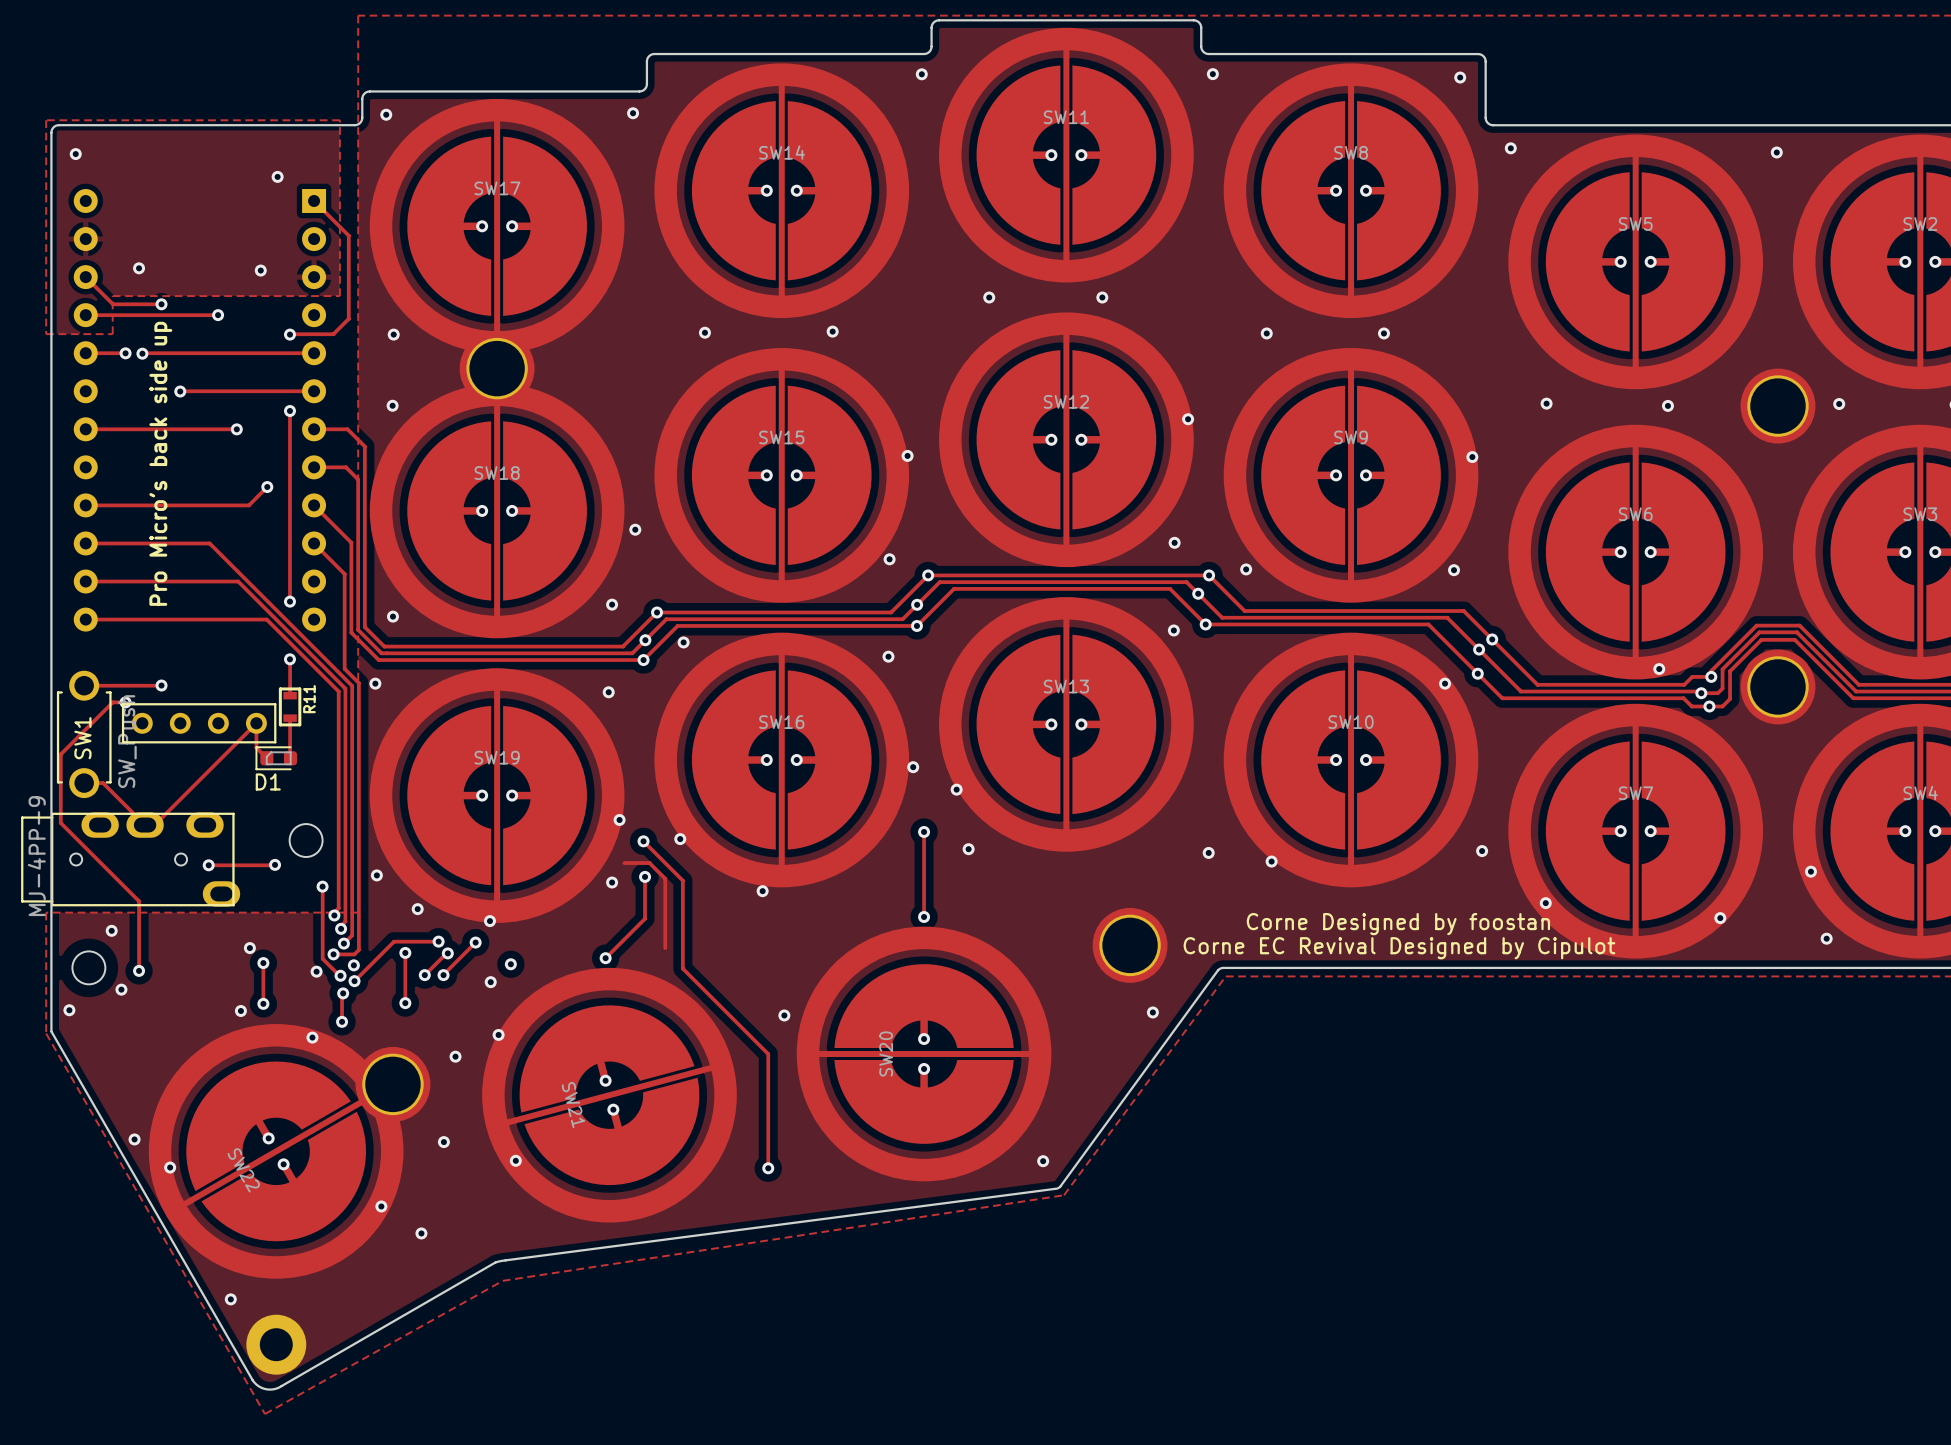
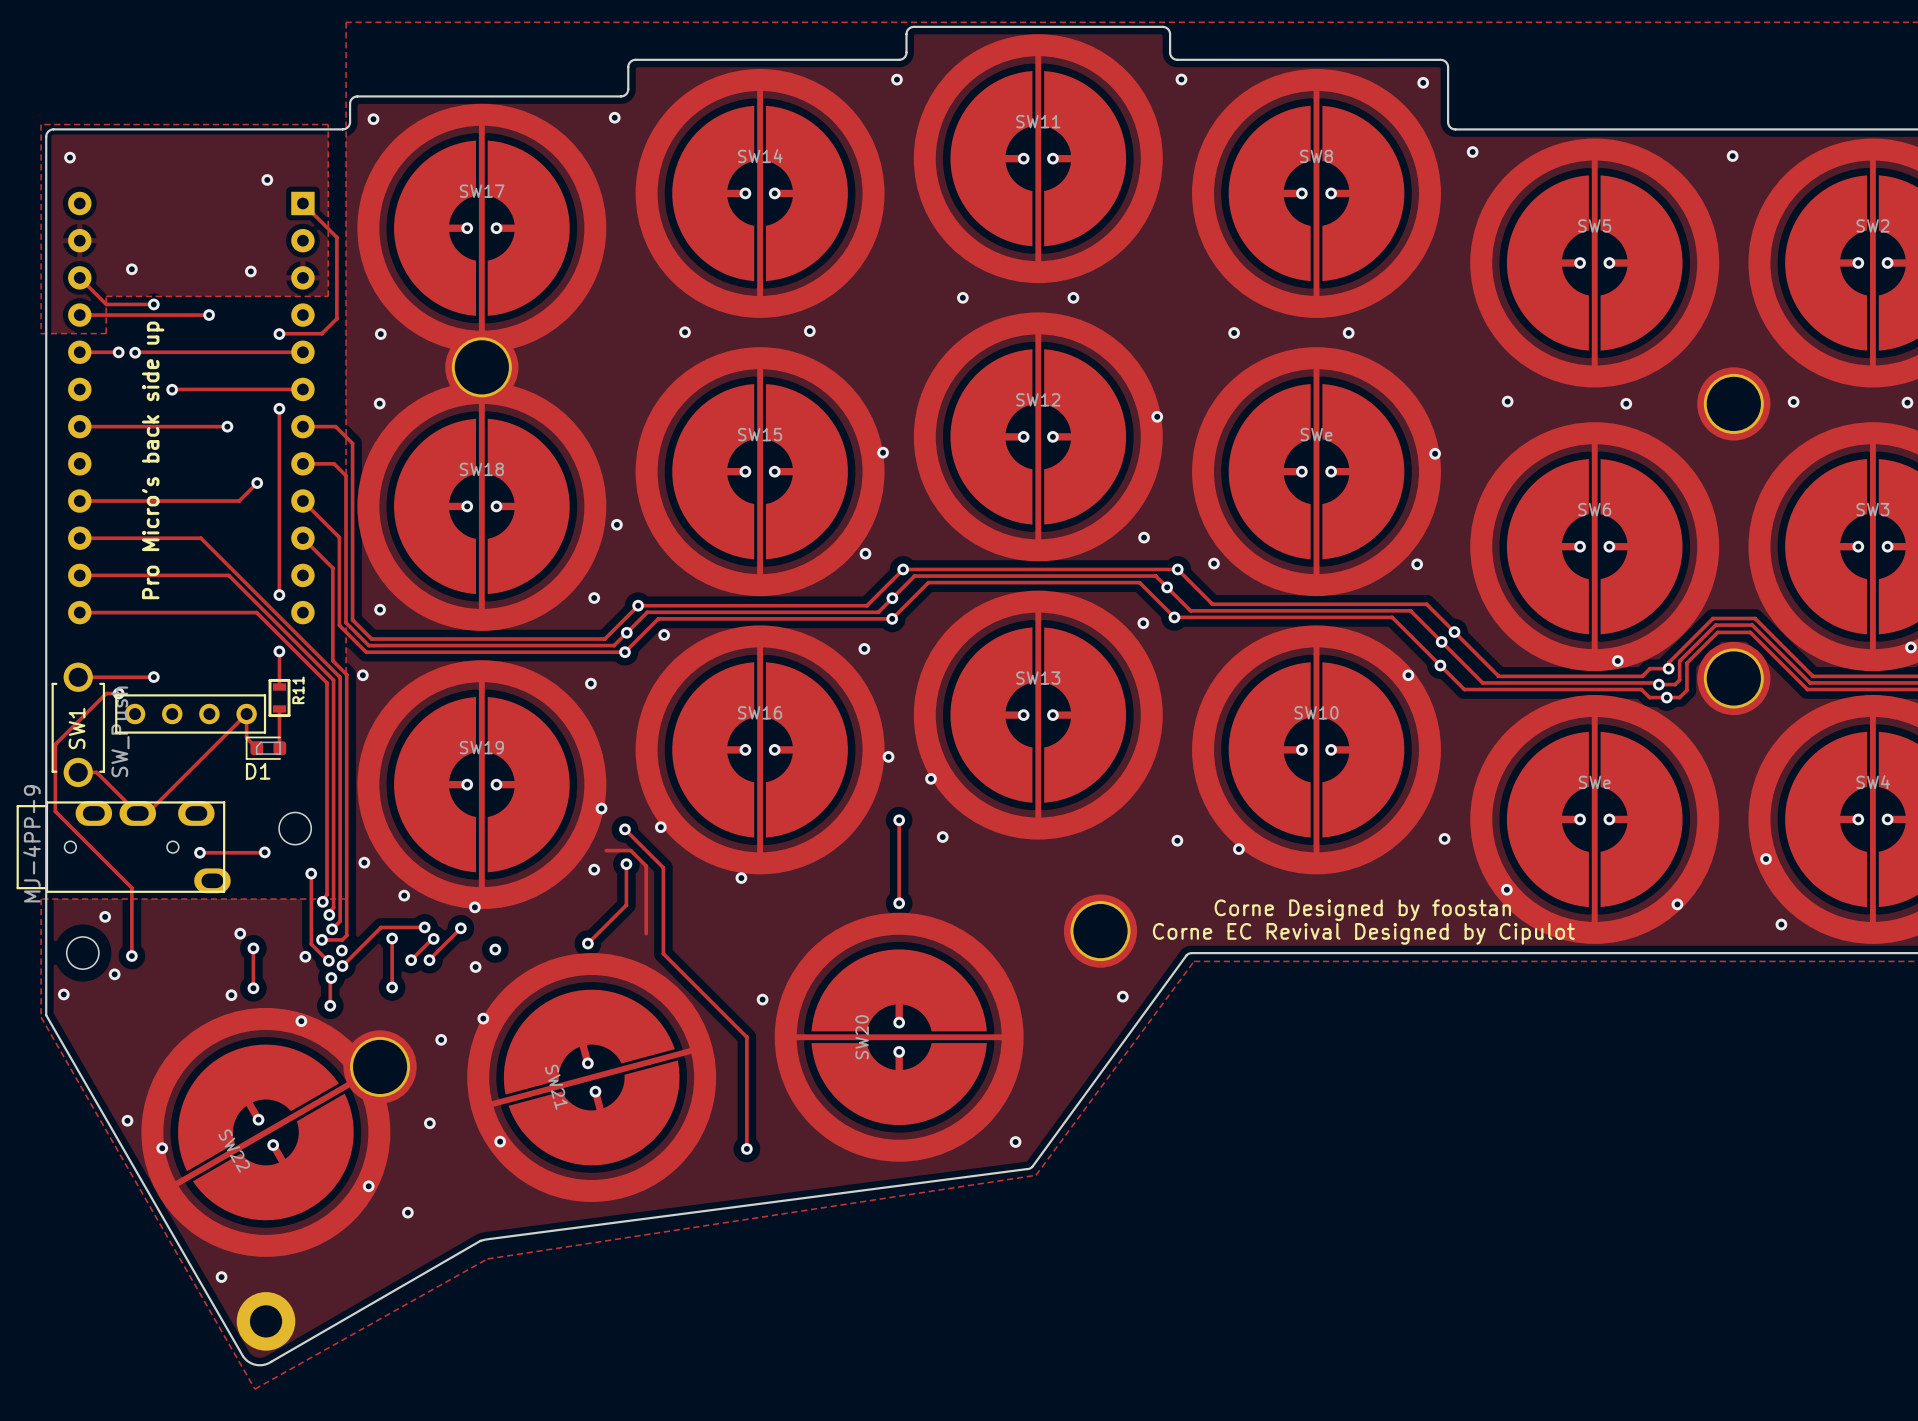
SW9 name: SW9 (1351, 437) -> SWe (1316, 434)
SW7 name: SW7 (1635, 793) -> SWe (1594, 782)

